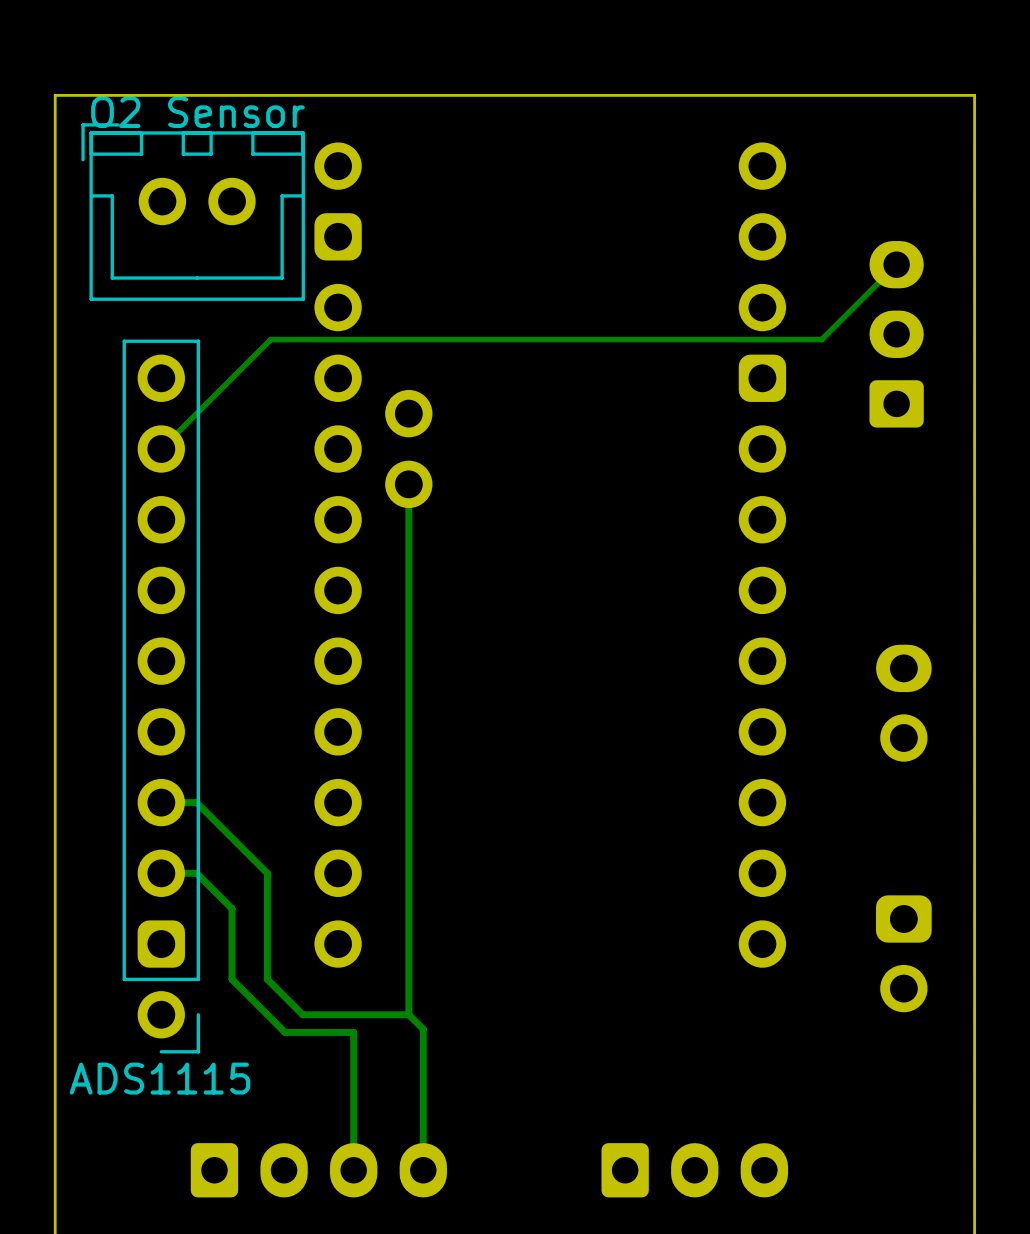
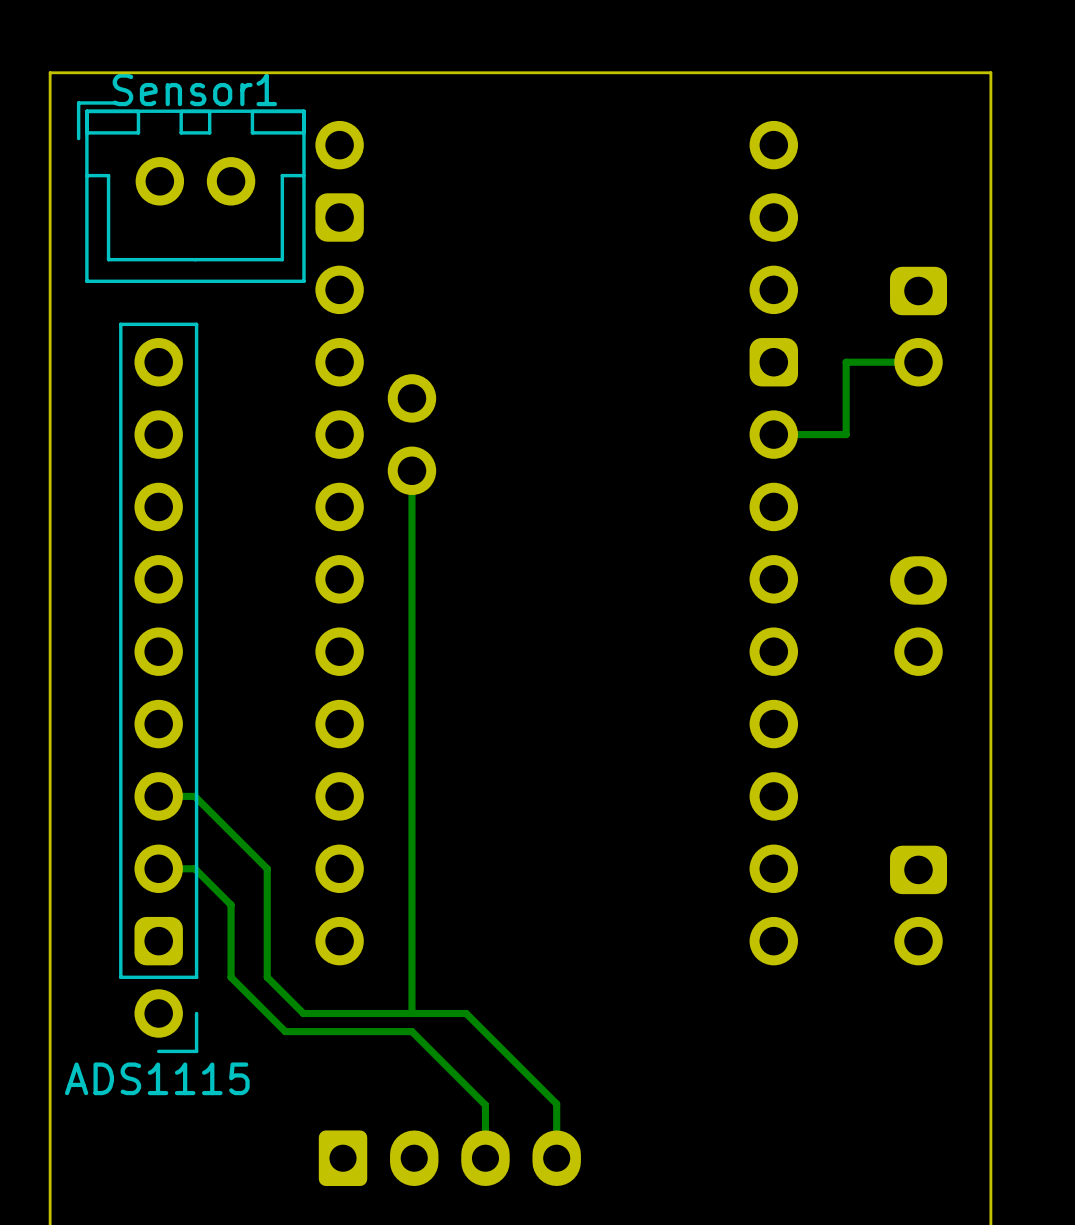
O2 Sensor name: O2 Sensor (197, 112) -> Sensor1 (194, 89)
part footprint: [869, 241, 924, 428] -> [890, 266, 948, 387]
track: (896, 264) (821, 339) (270, 339) (161, 449) -> none
track: none -> (918, 362) (846, 362) (846, 434) (773, 434)
part position: (903, 703) -> (918, 616)
part position: (903, 953) -> (918, 905)
track: (408, 1014) (423, 1029) (423, 1155) -> (411, 1013) (466, 1013) (556, 1103) (556, 1158)
track: (353, 1032) (353, 1155) -> (355, 1031) (411, 1031) (485, 1105) (485, 1158)
part position: (318, 1170) -> (449, 1158)
part: (694, 1170) -> none

